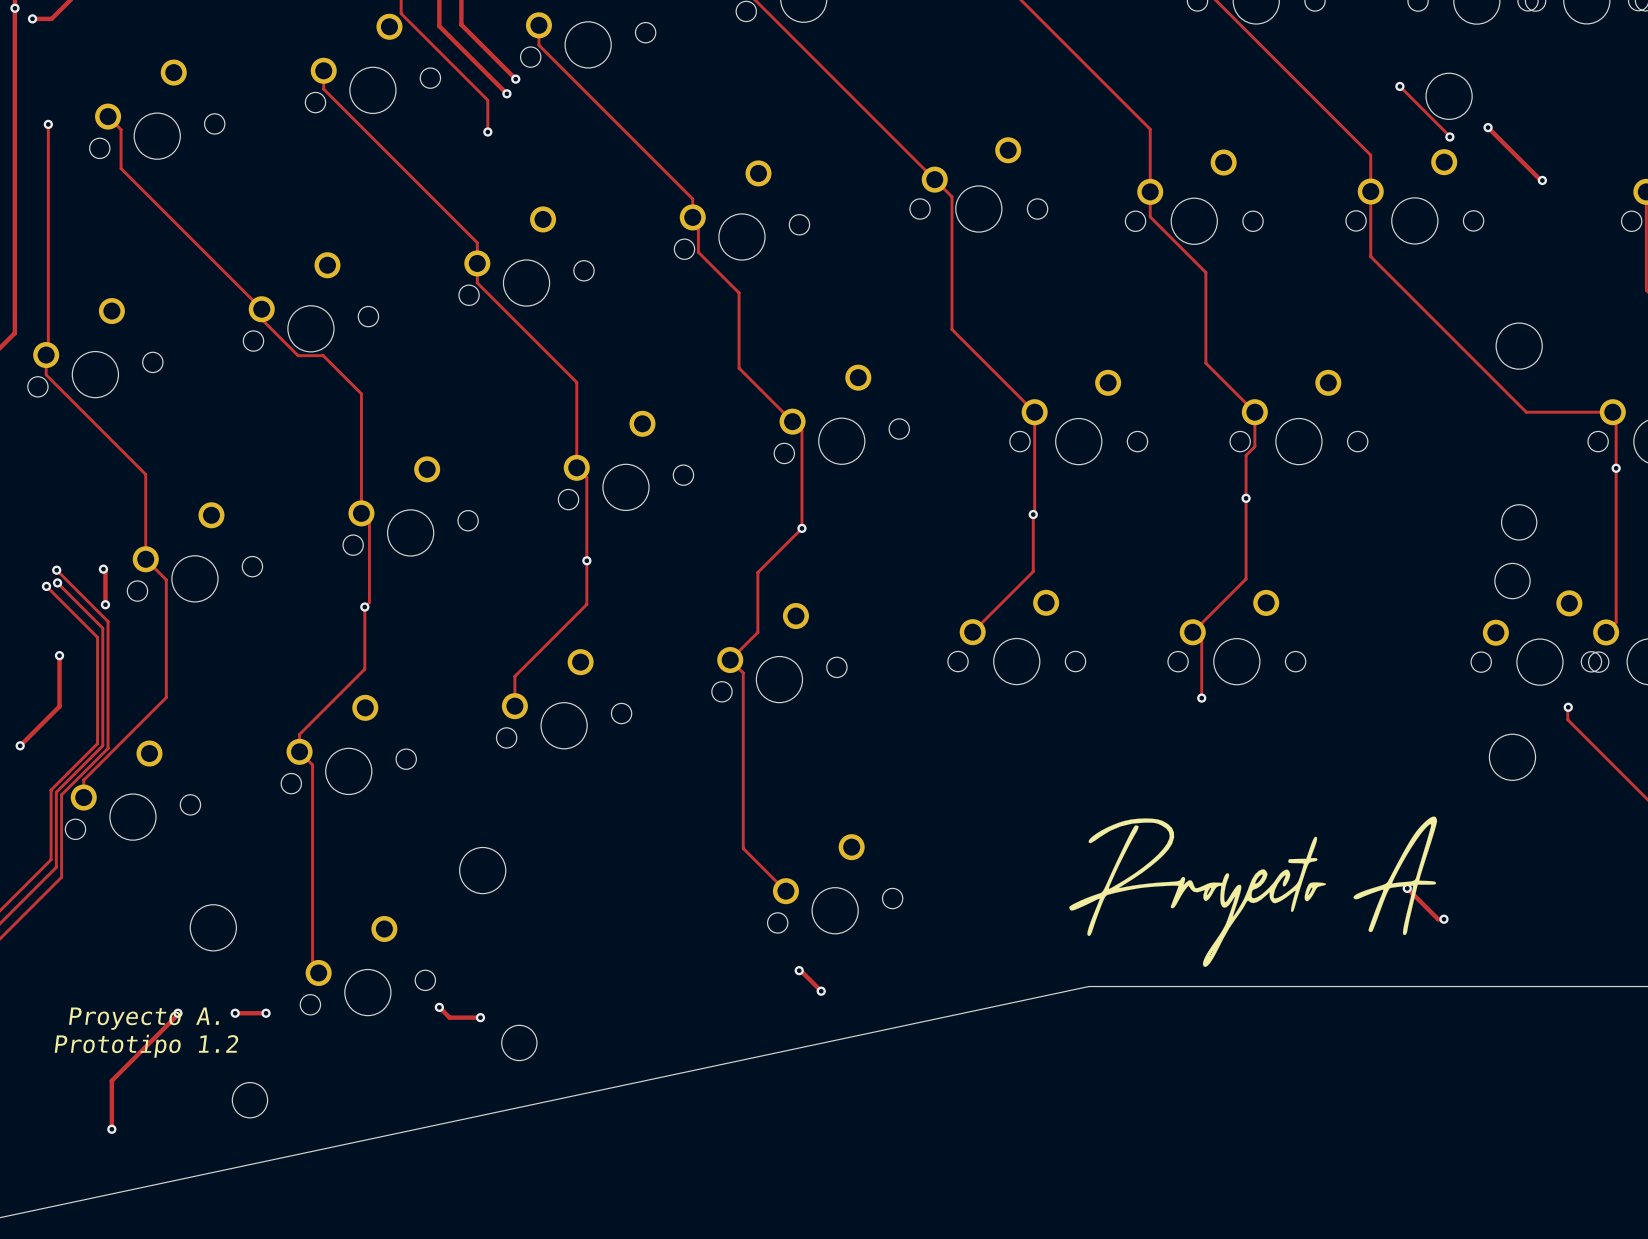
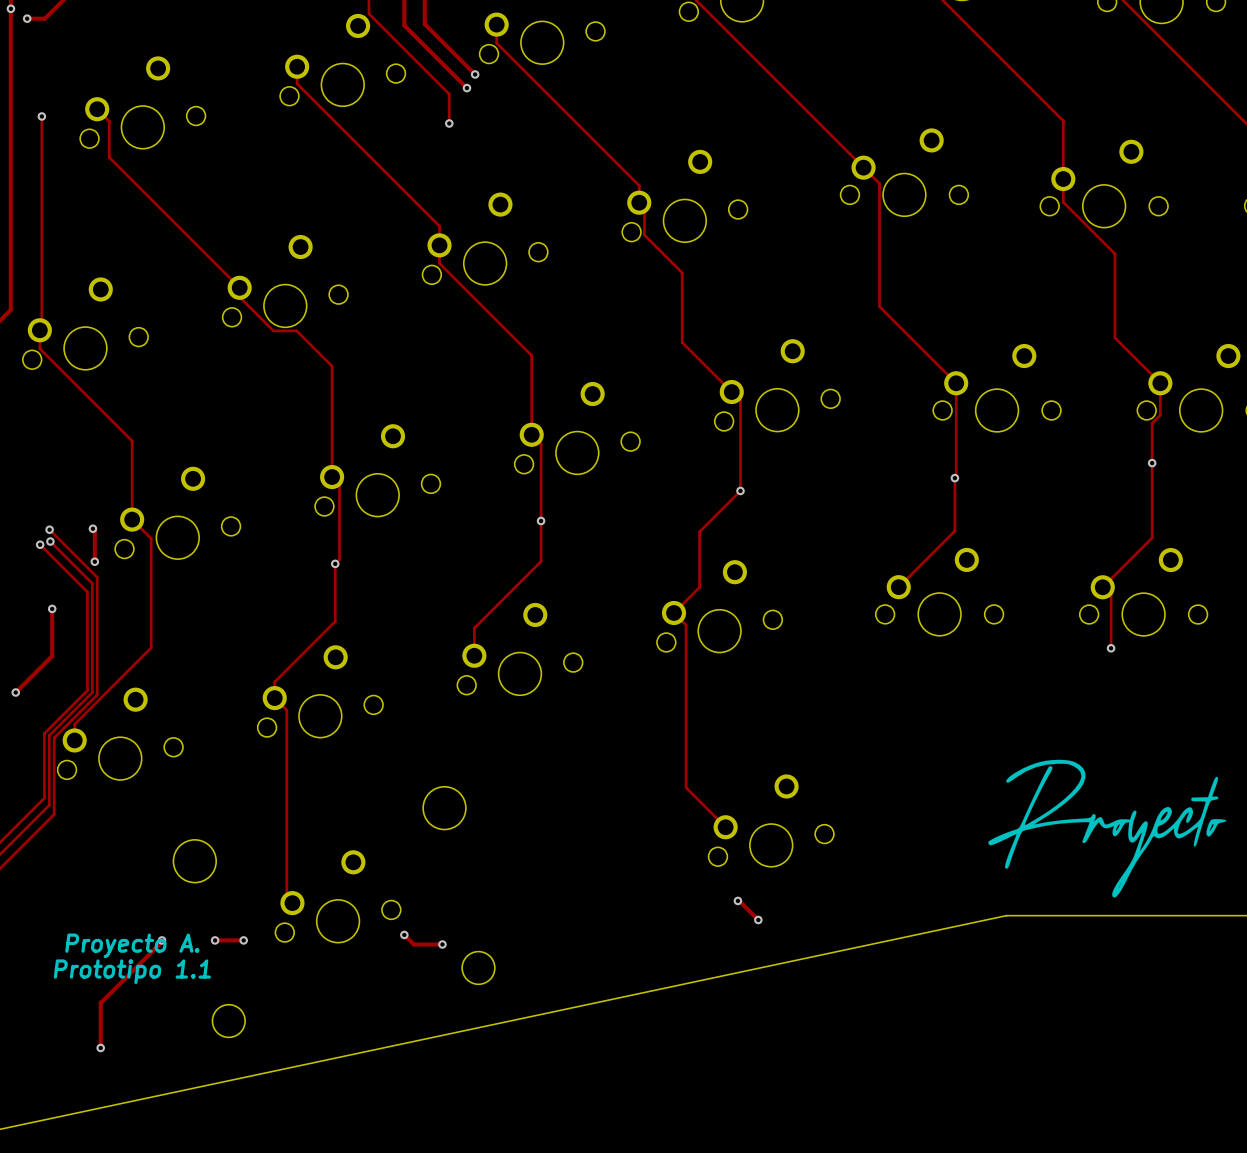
text: Prototipo 1.2 (146, 1046) -> Prototipo 1.1 (132, 971)

